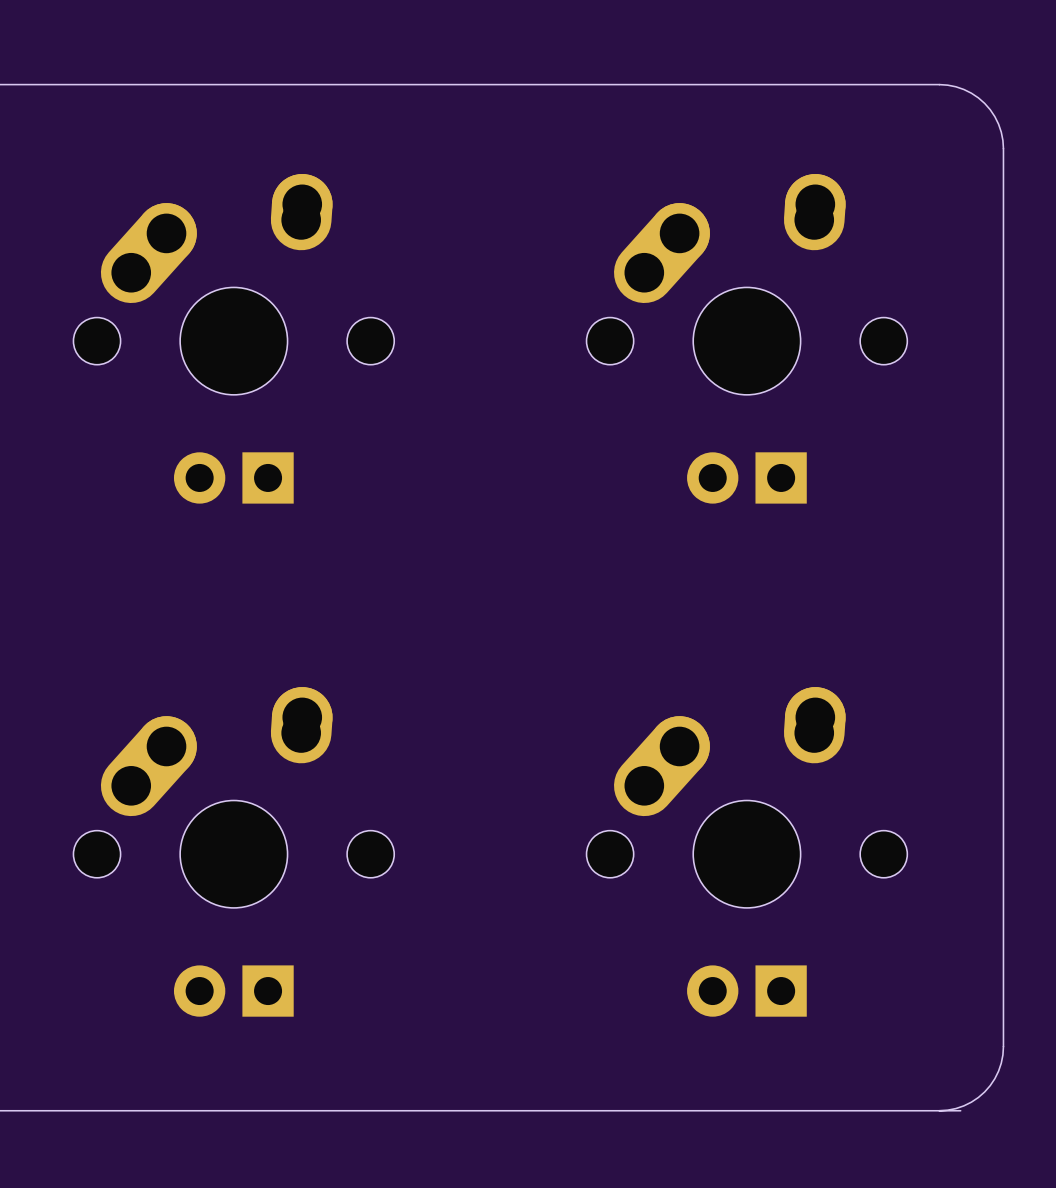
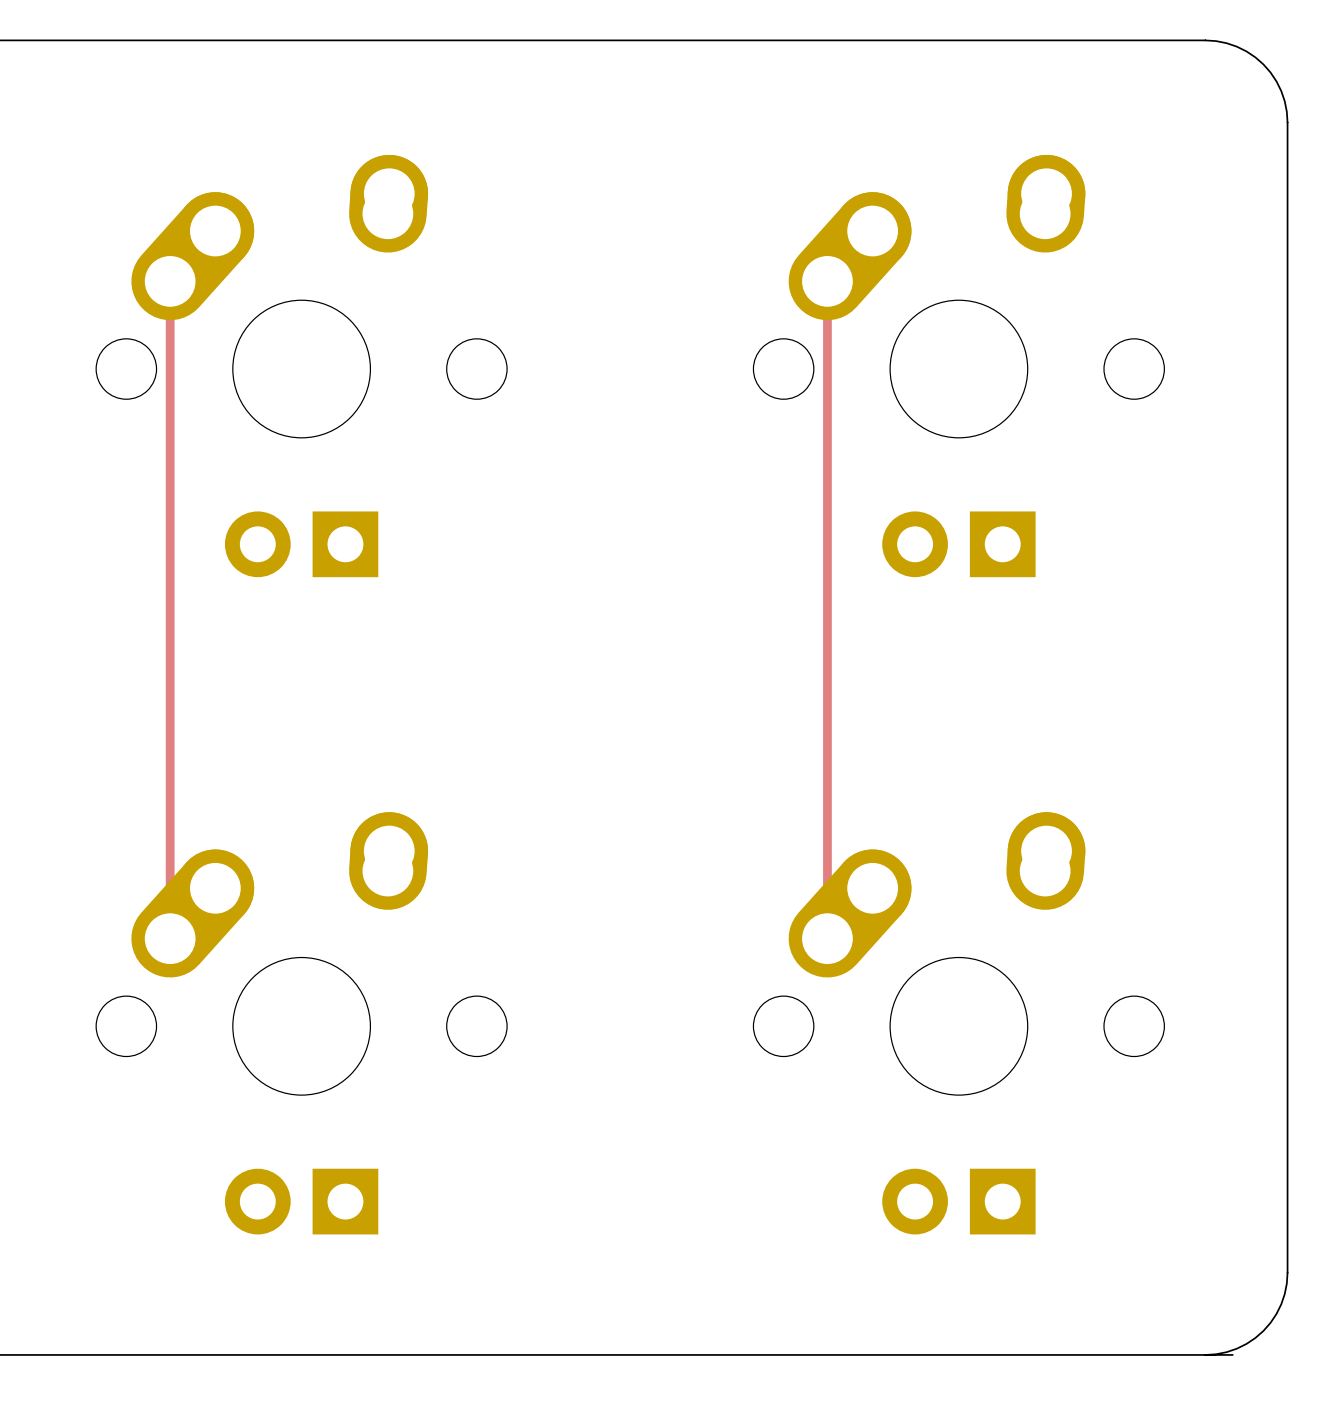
track: none -> (170, 276) (170, 938)
track: none -> (827, 281) (827, 938)

